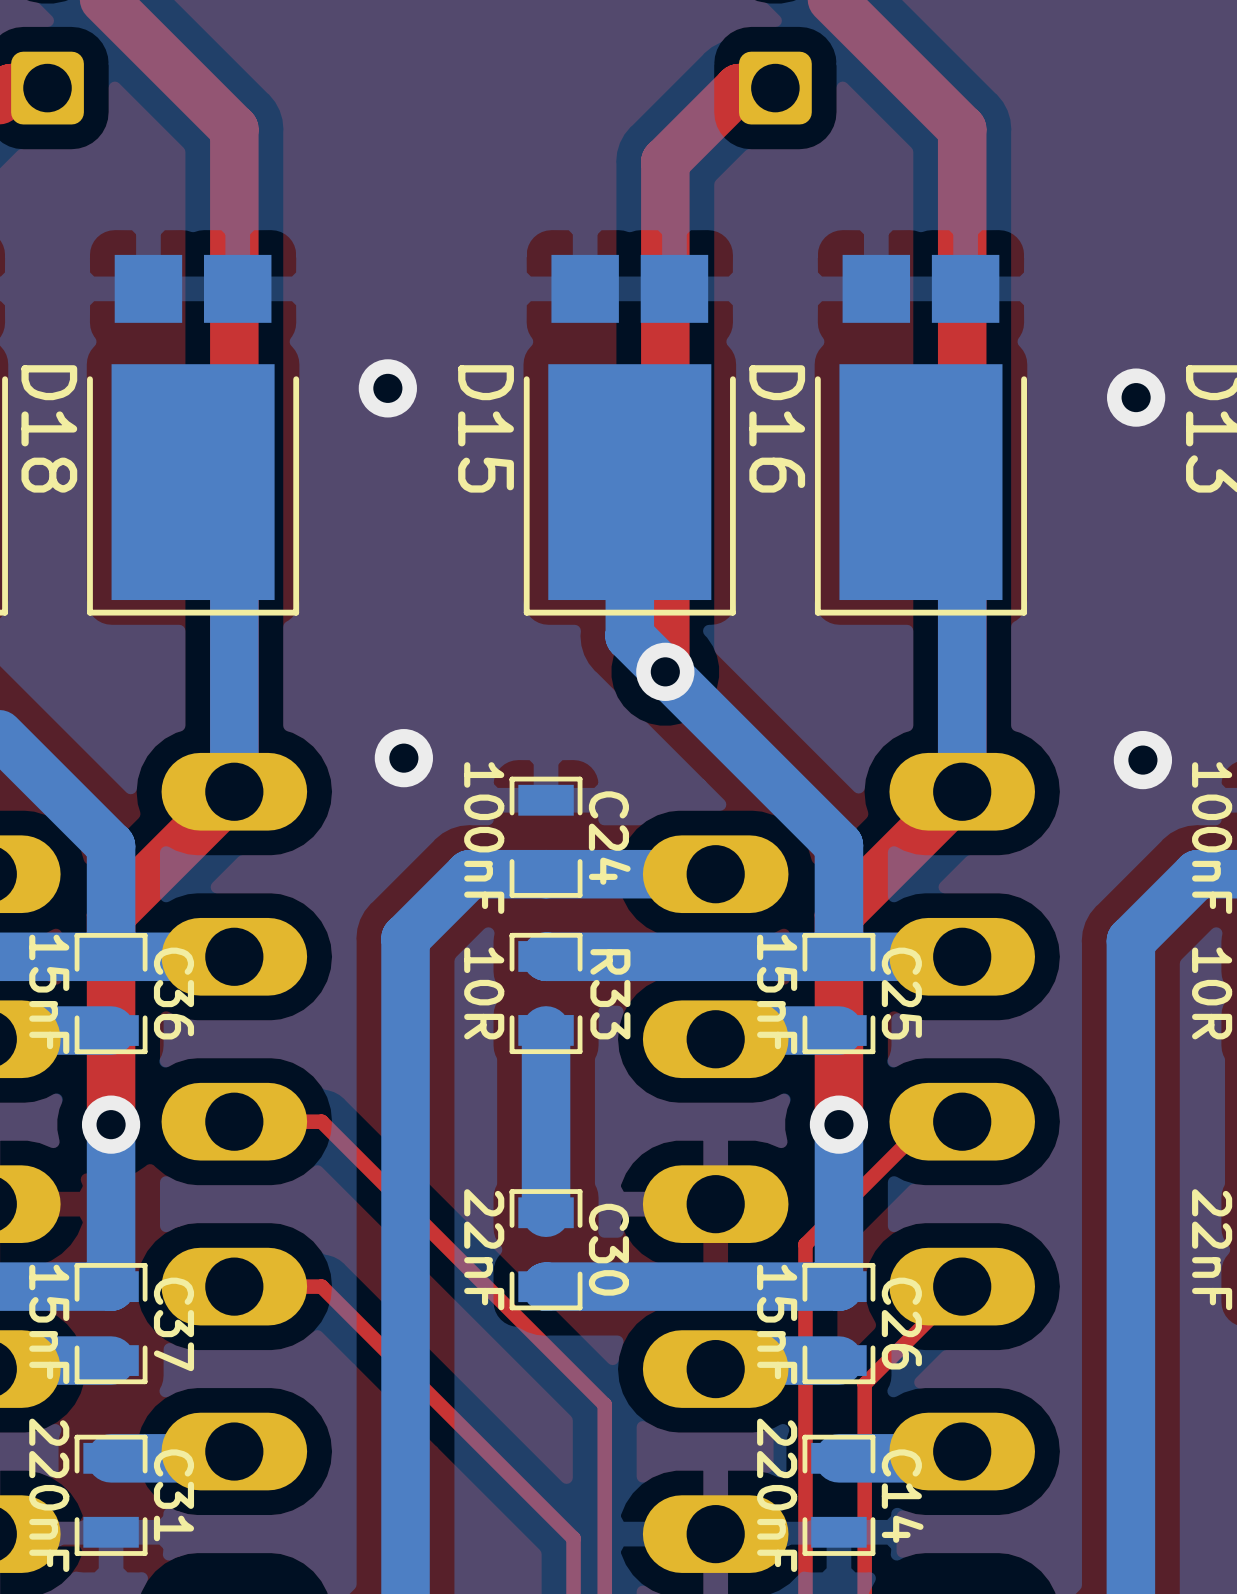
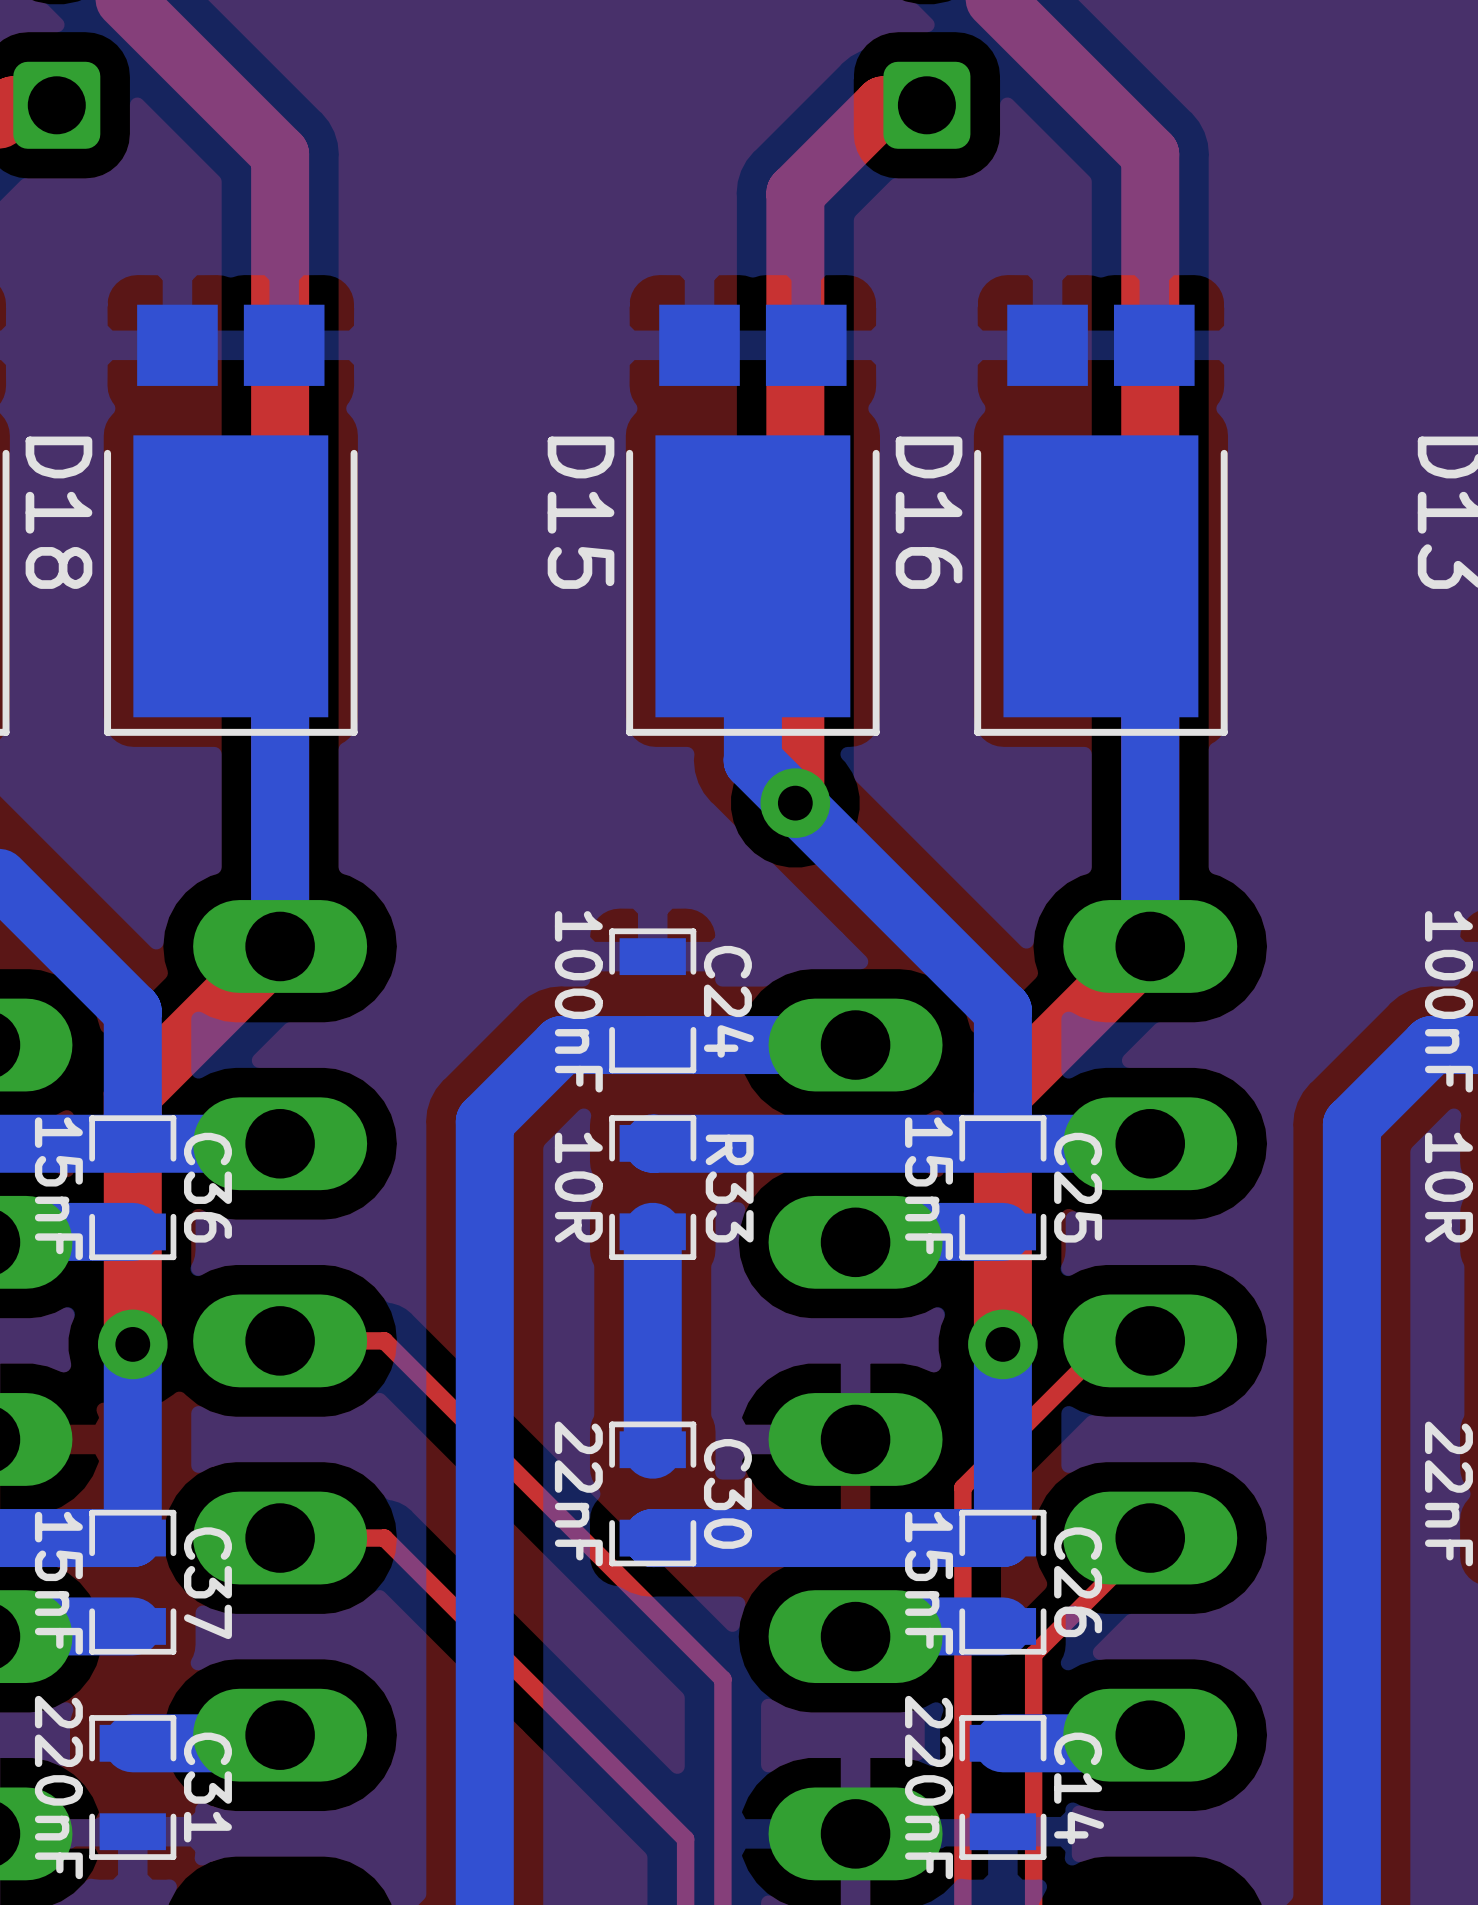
via: (387, 388) -> none
via: (1136, 397) -> none
via: (403, 758) -> none
via: (1142, 760) -> none

